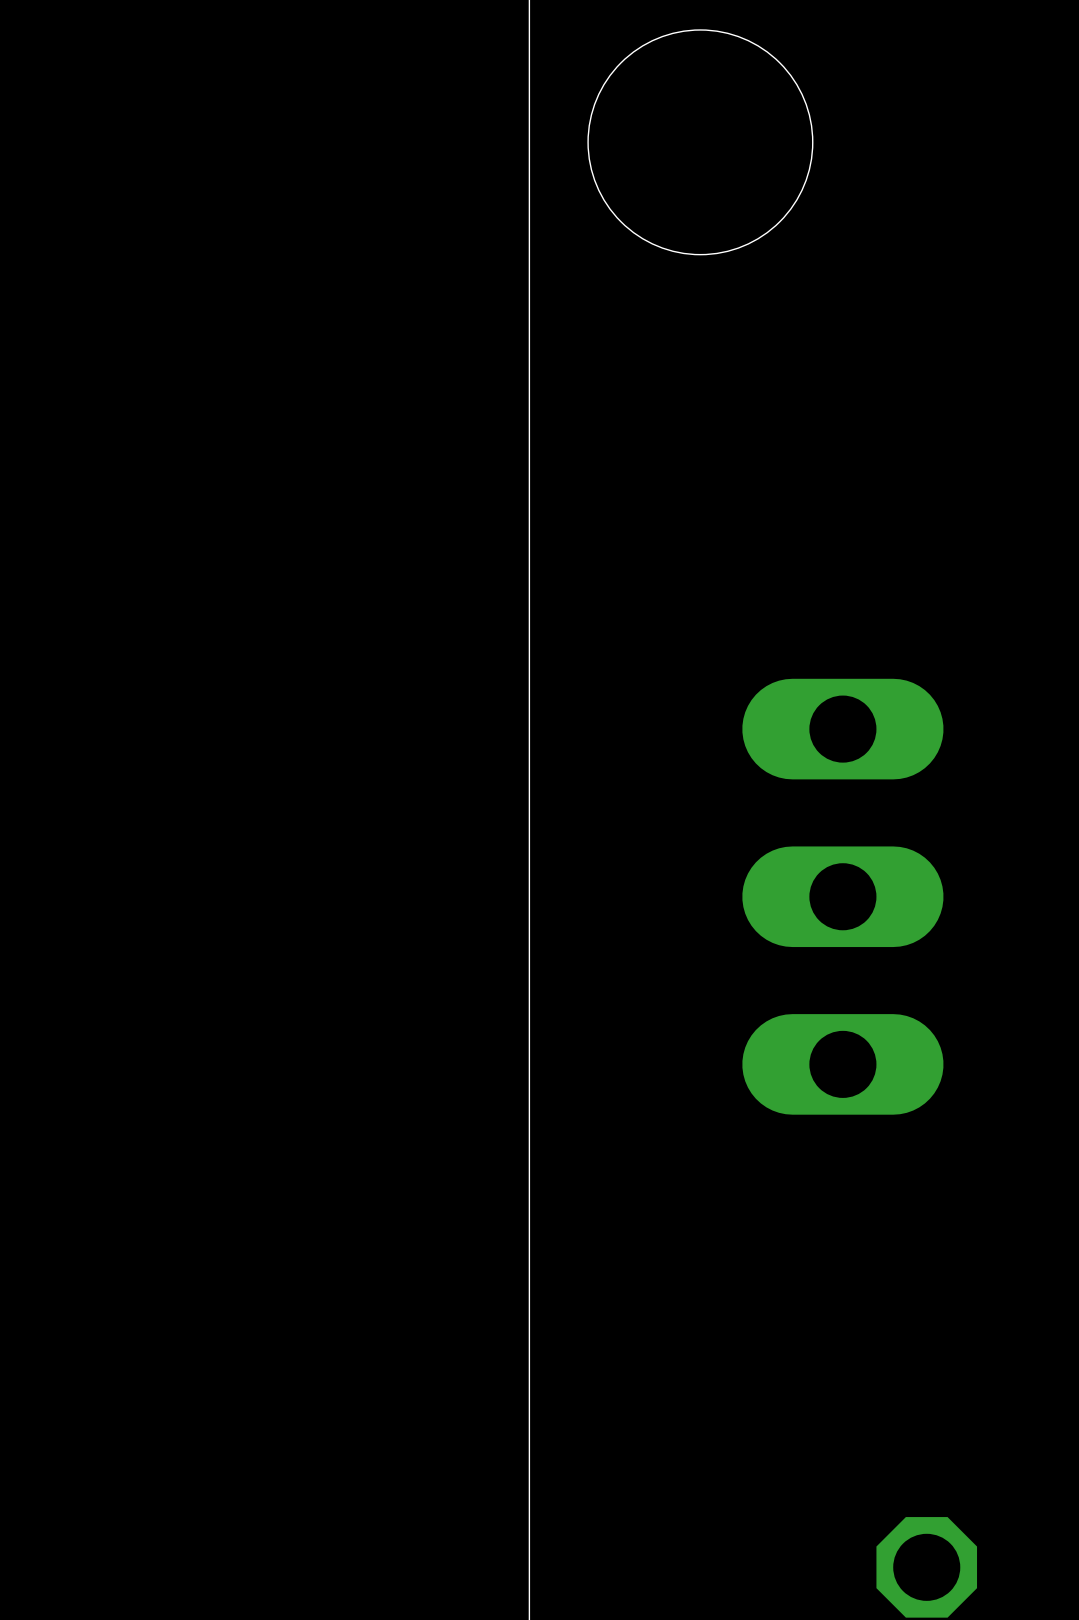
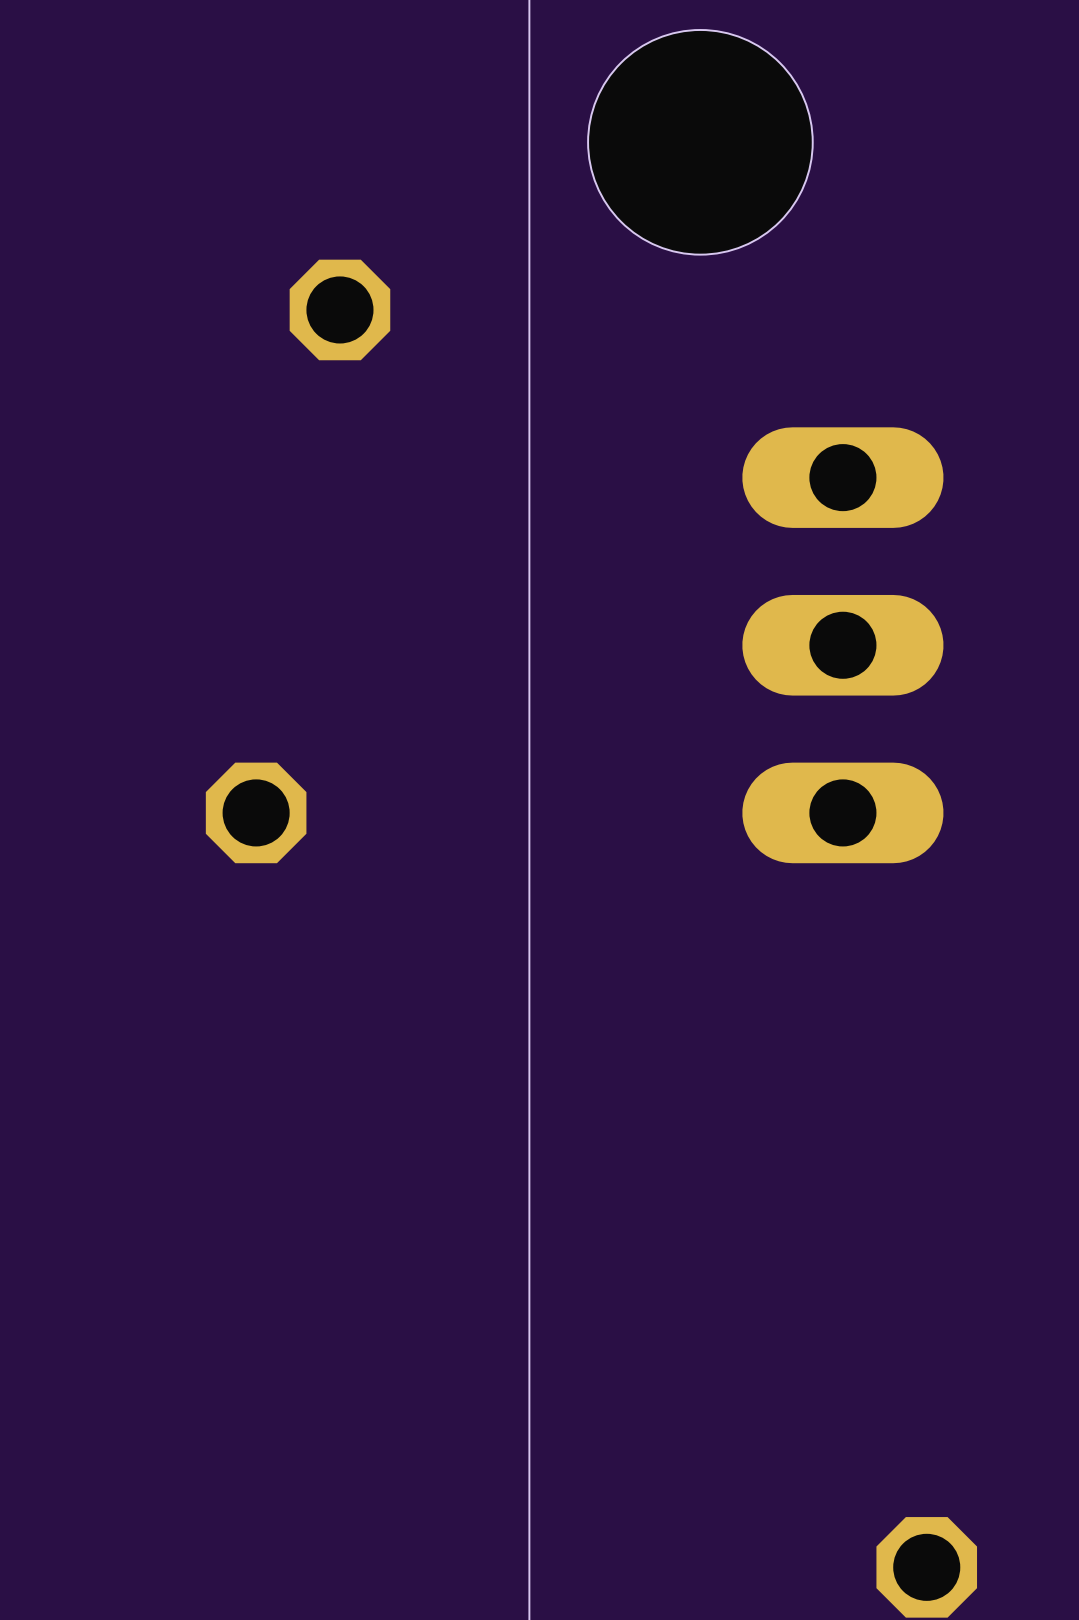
part: none -> (339, 309)
part: none -> (256, 812)
part position: (842, 896) -> (842, 645)

